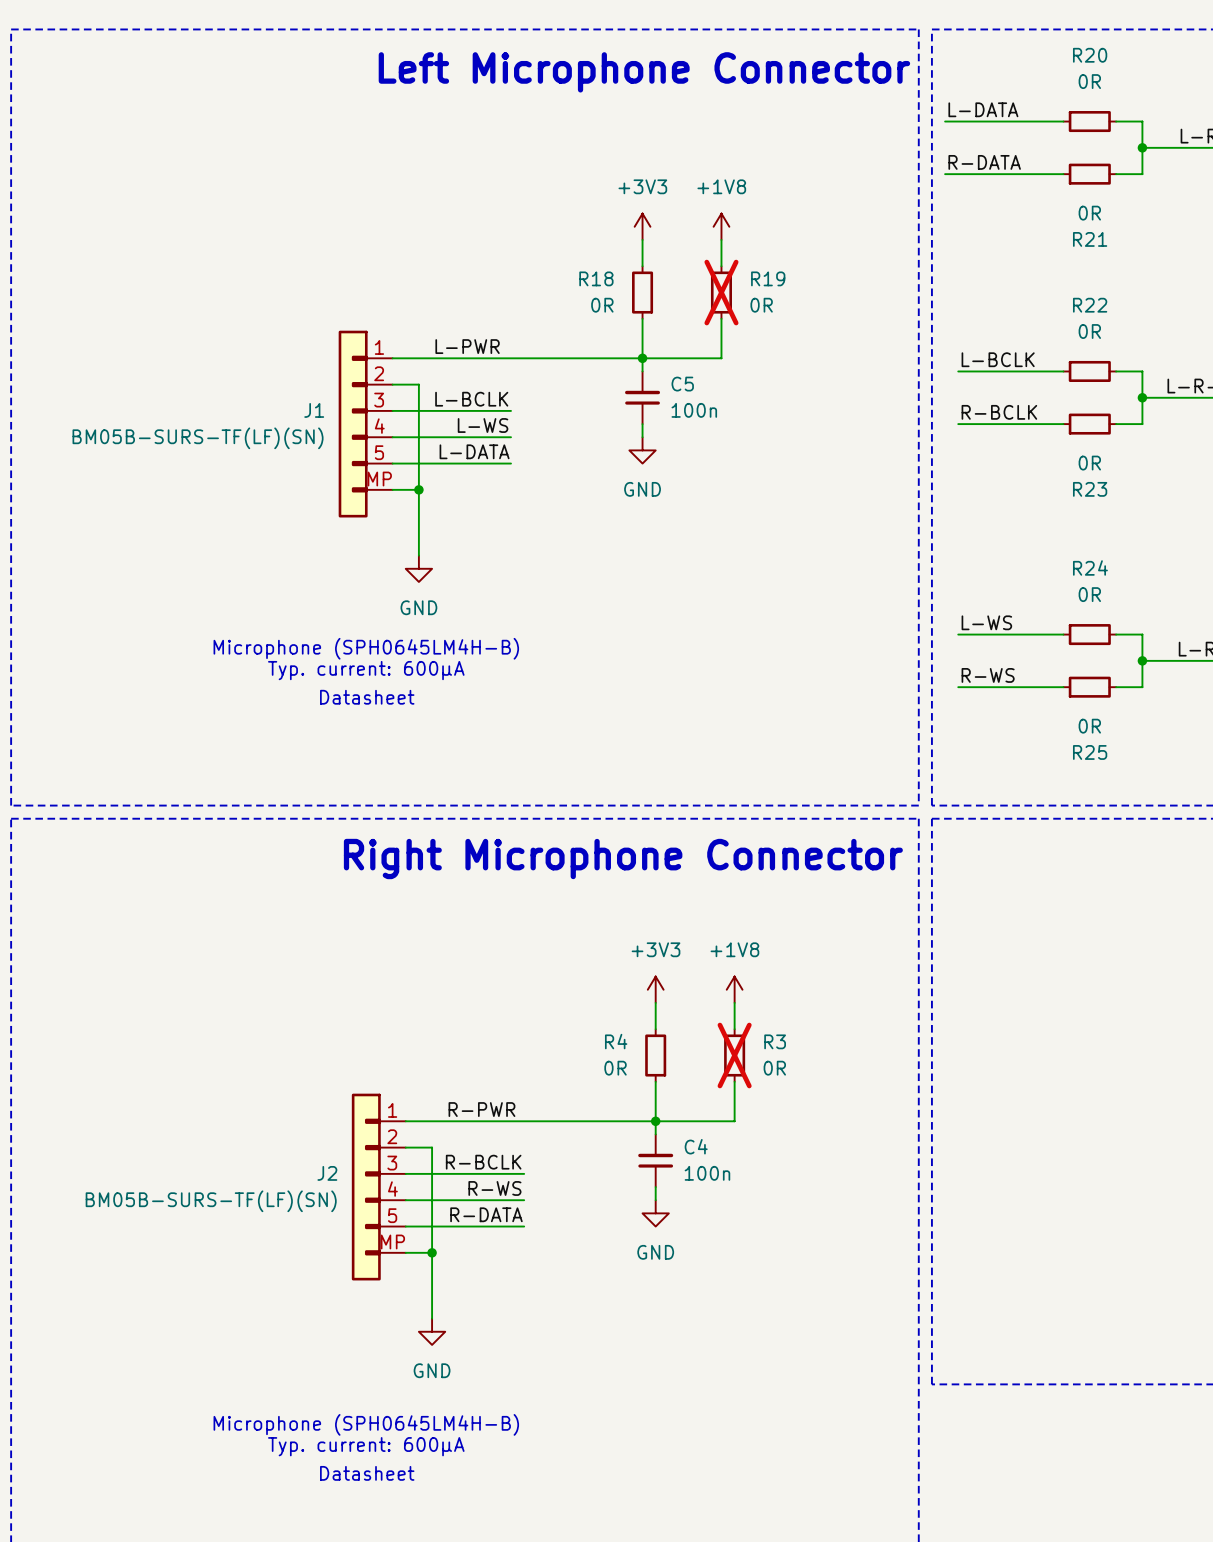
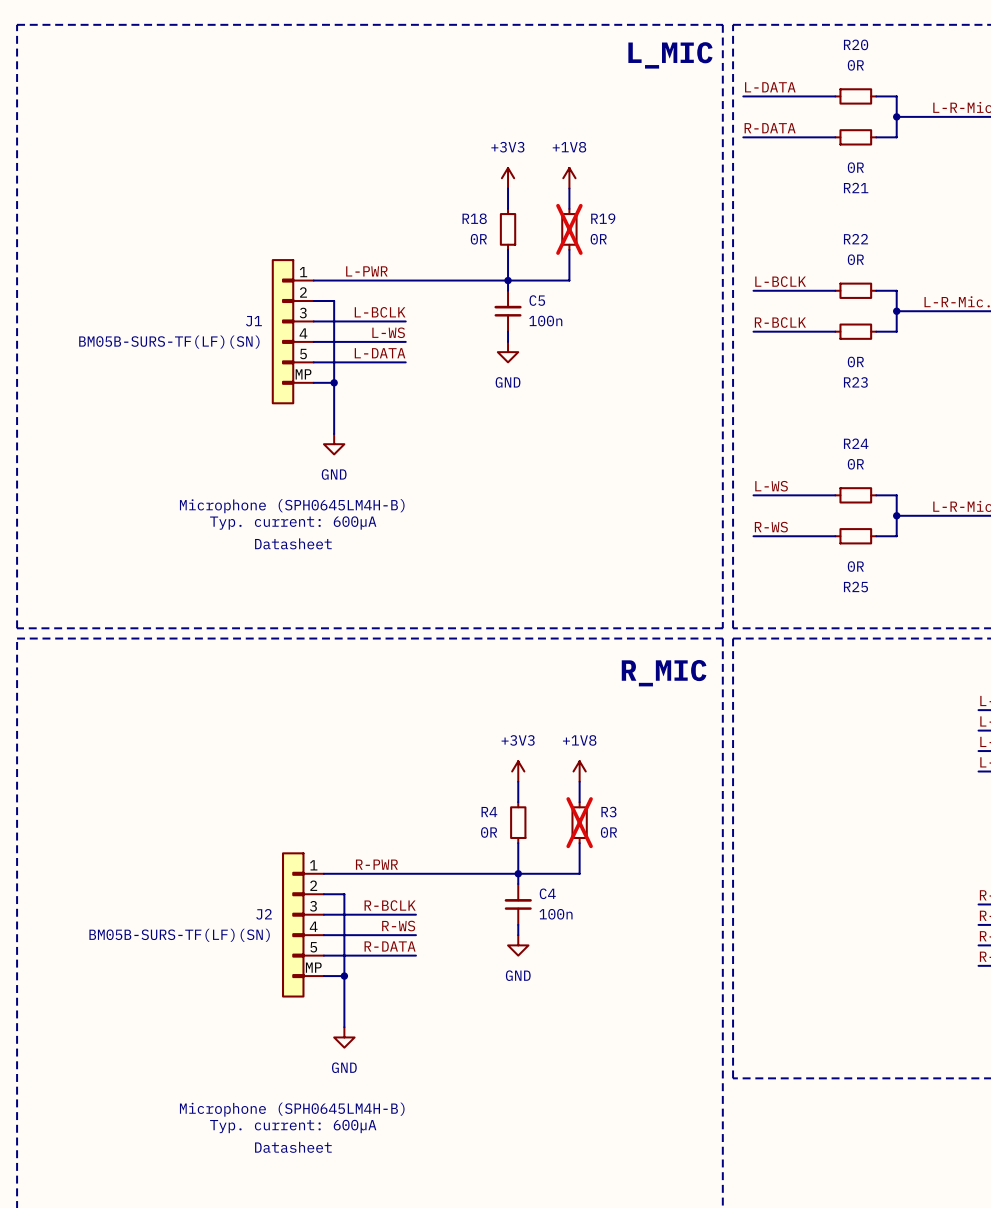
text: none -> L_MIC (670, 55)
text: Left Microphone Connector (644, 72) -> none
text: Right Microphone Connector (623, 859) -> none
text: none -> R_MIC (664, 673)

